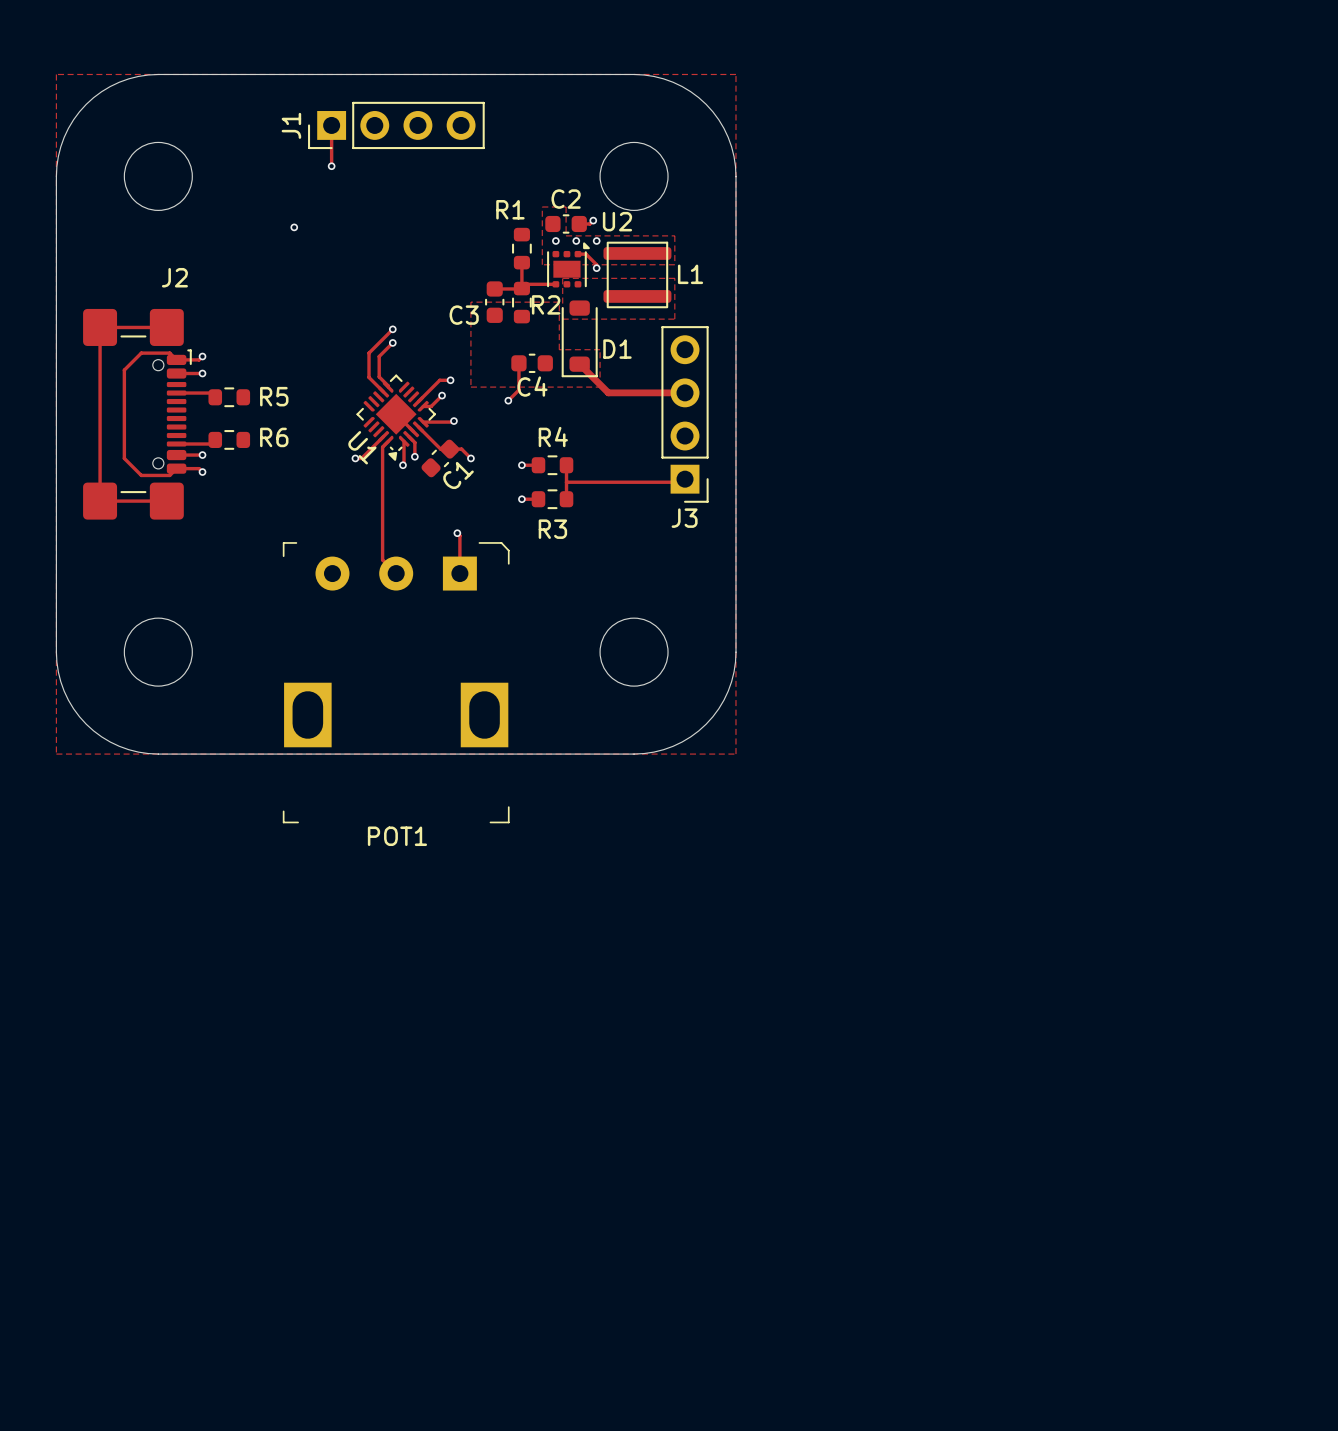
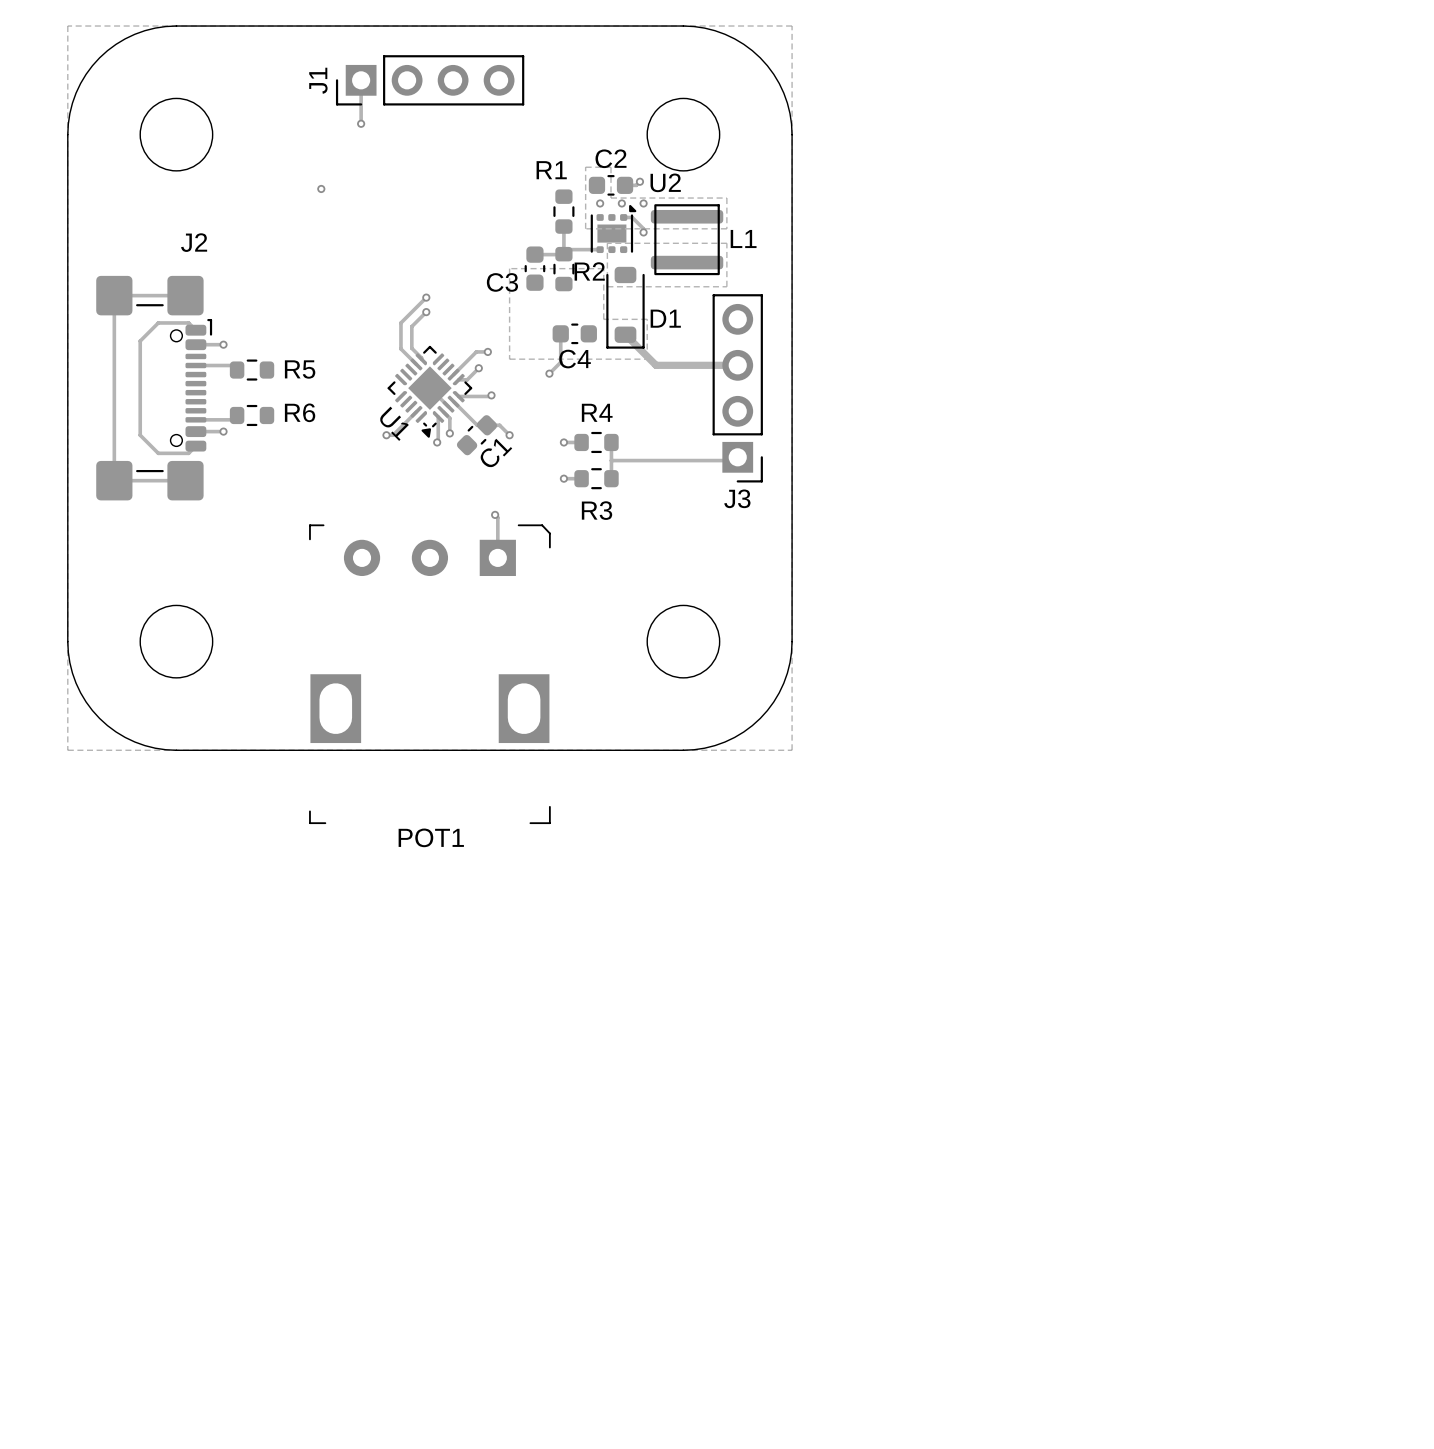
track: (202, 356) (199, 359) (176, 359) -> none
via: (202, 356) -> none
track: (388, 441) (382, 447) (382, 559) (396, 573) -> none
track: (176, 468) (199, 468) (202, 472) -> none
via: (202, 472) -> none

